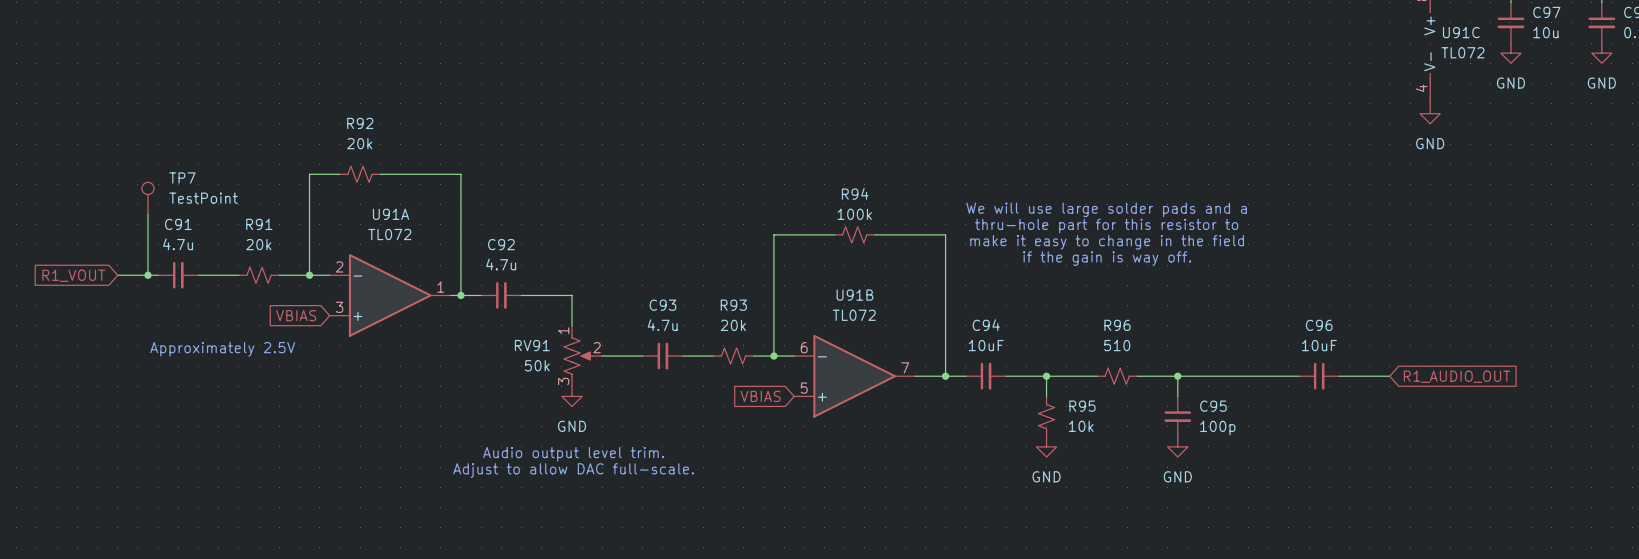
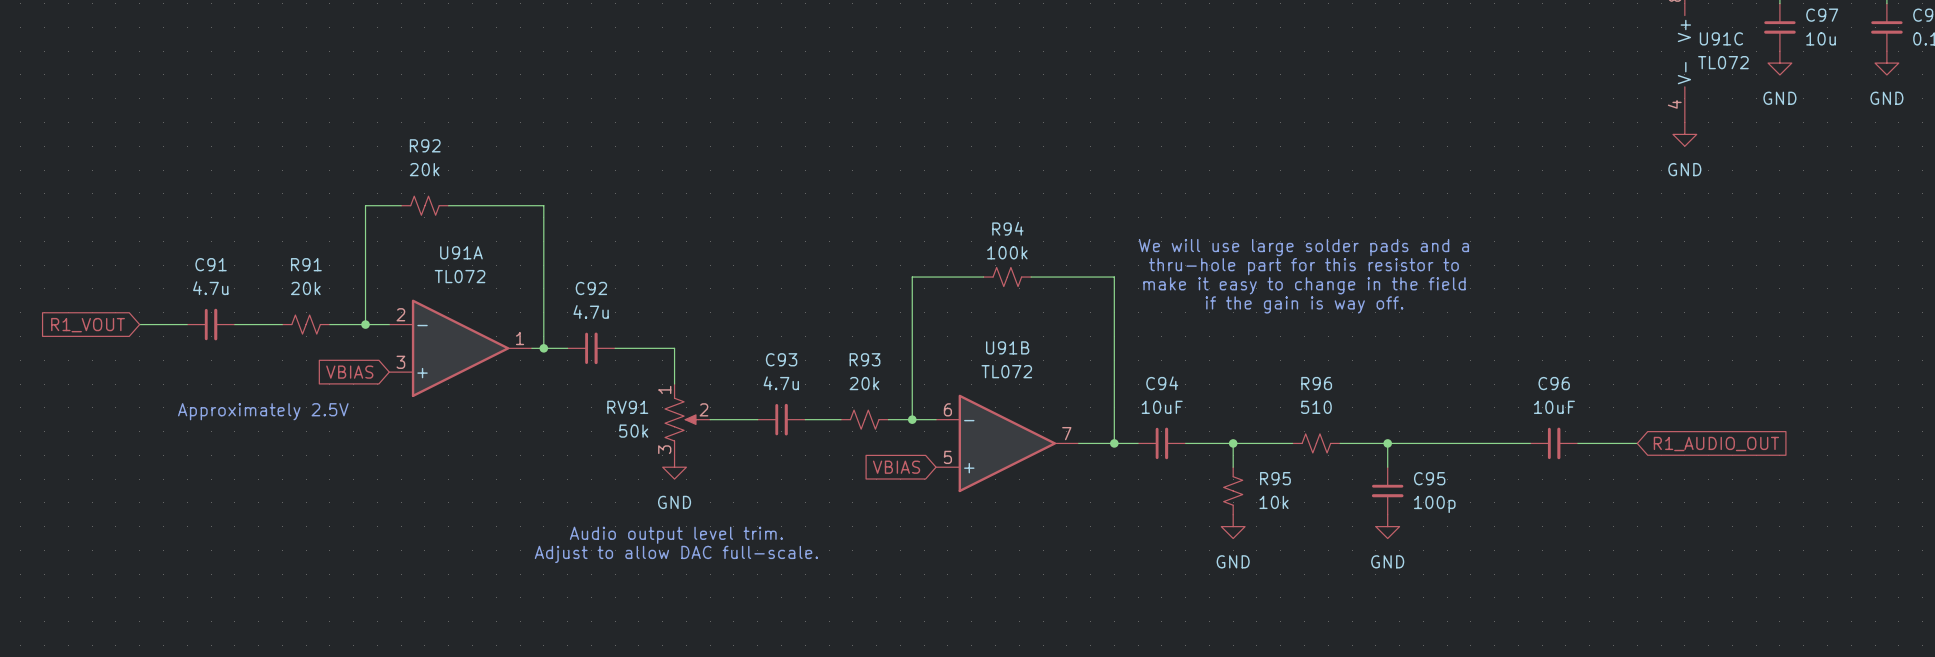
TP7: TestPoint (147, 198) -> none
wire: (147, 214) (147, 275) -> none
junction: (147, 275) -> none

